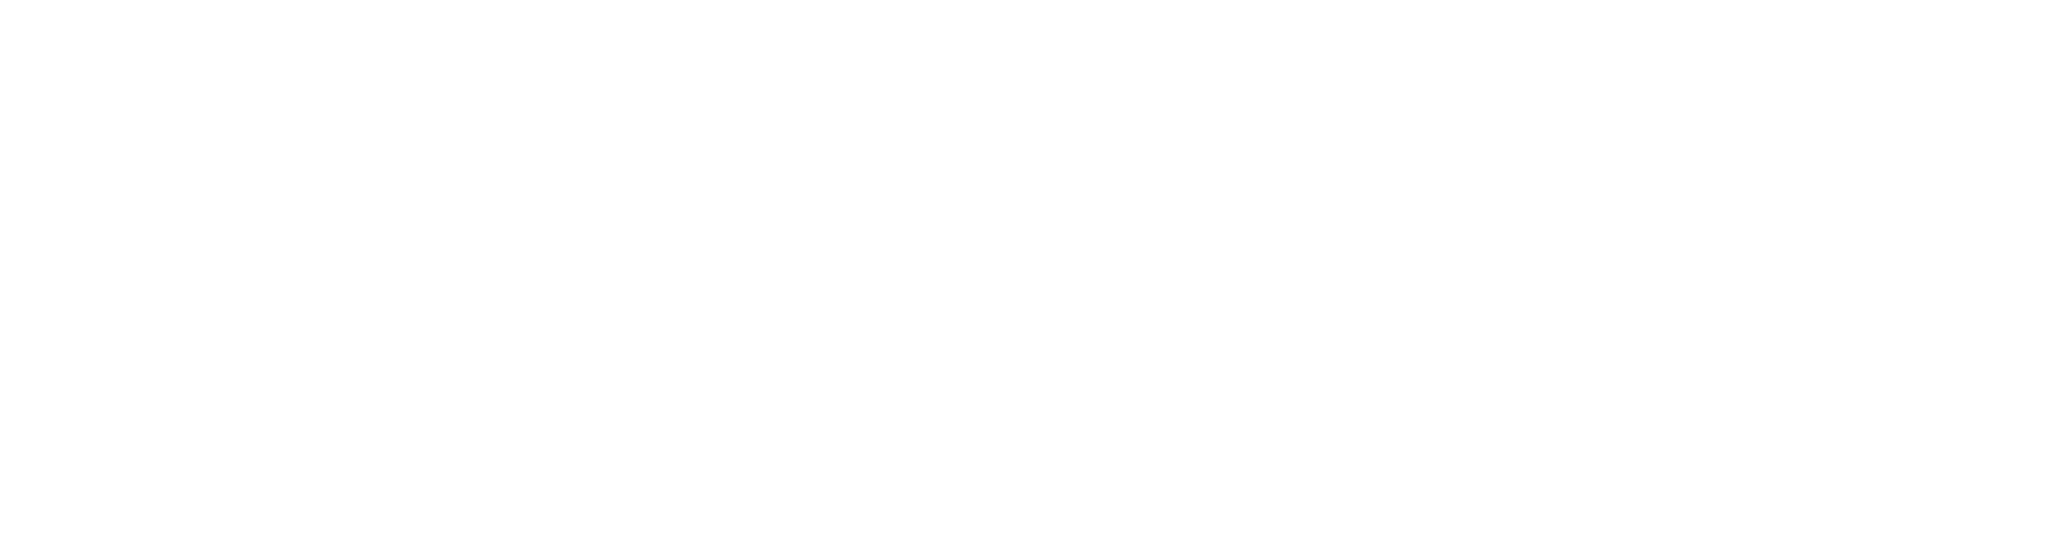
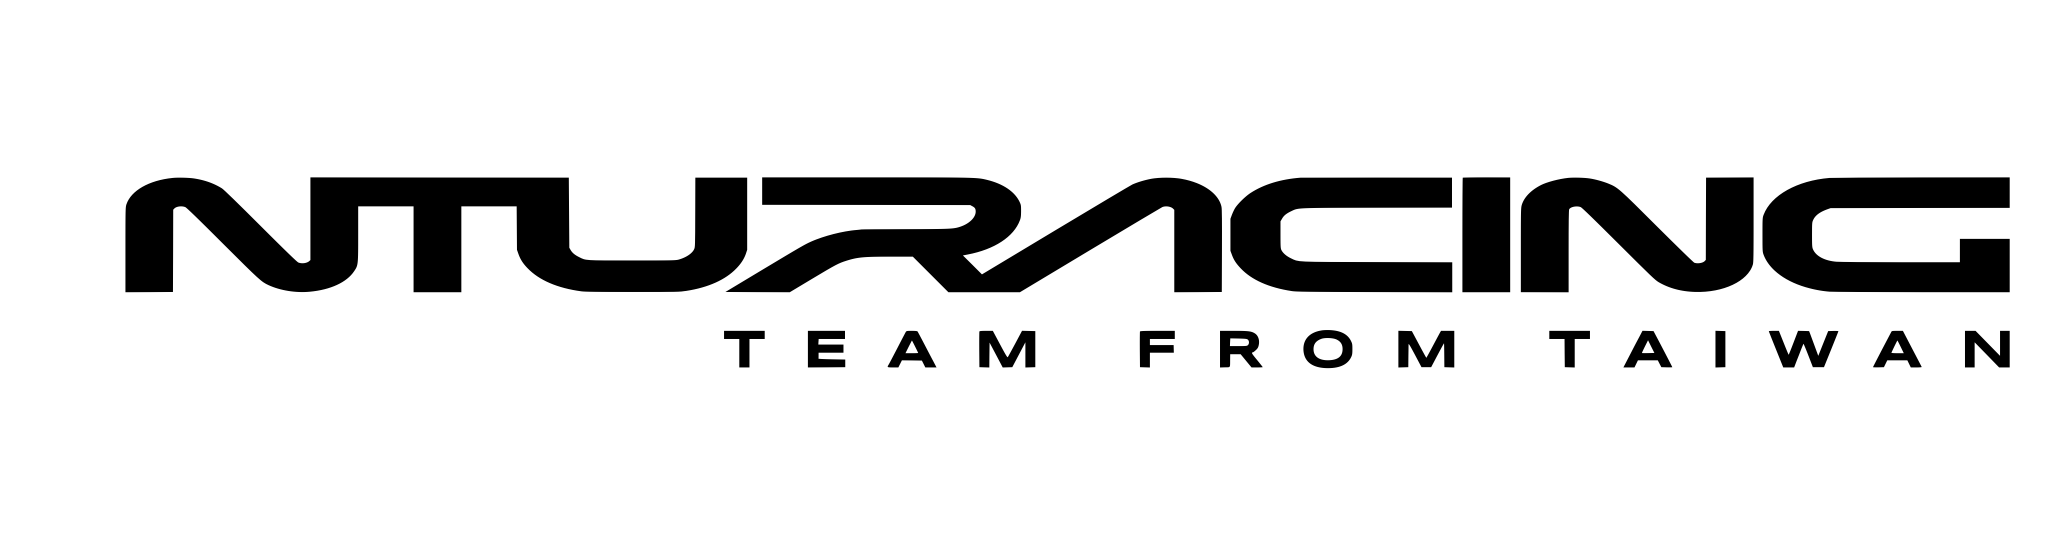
drawing: none -> [125, 177, 2010, 369]

